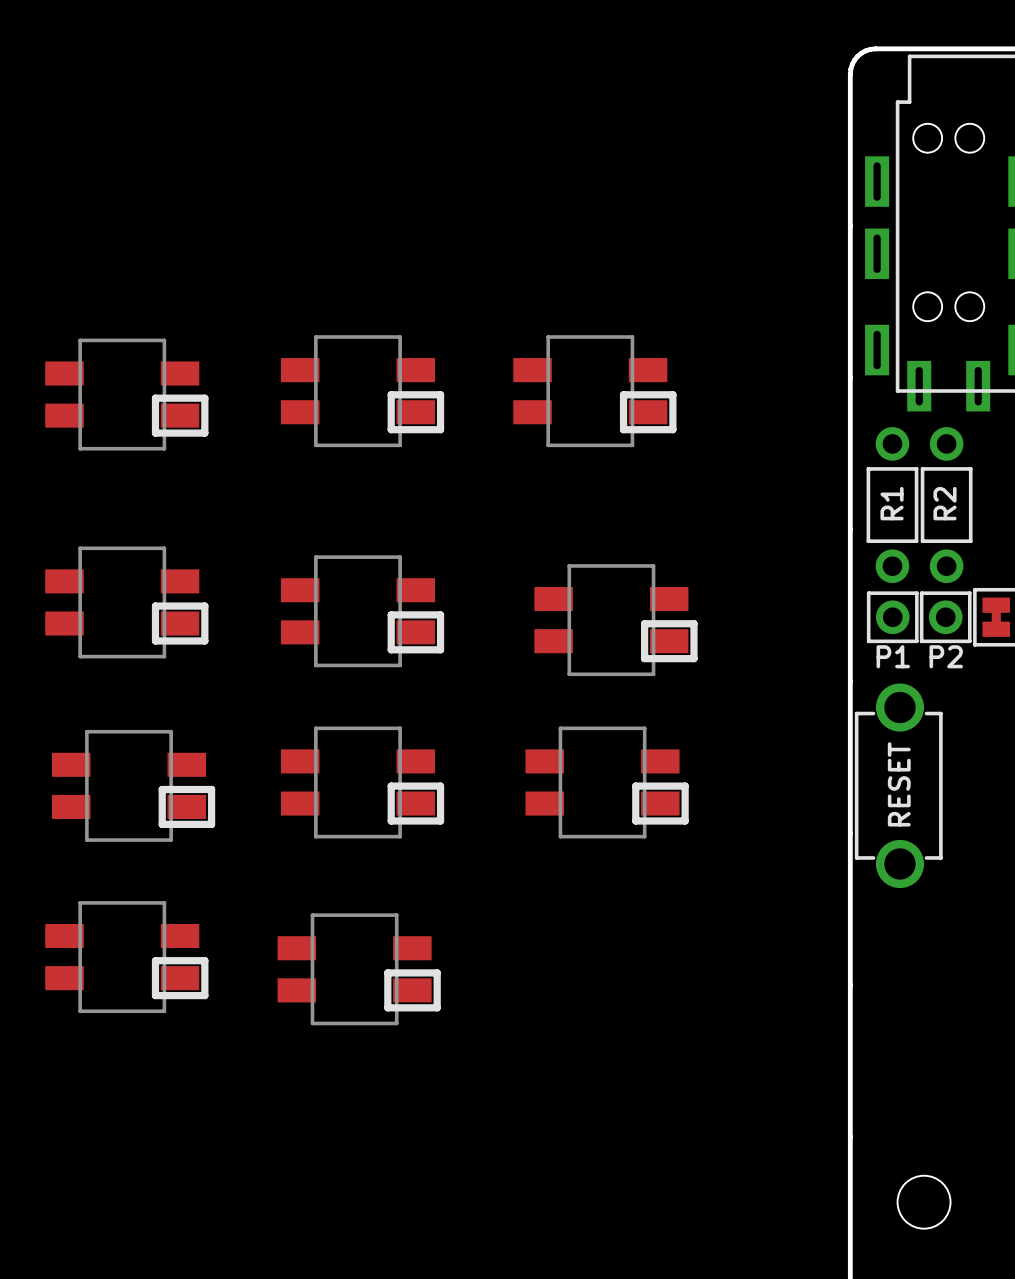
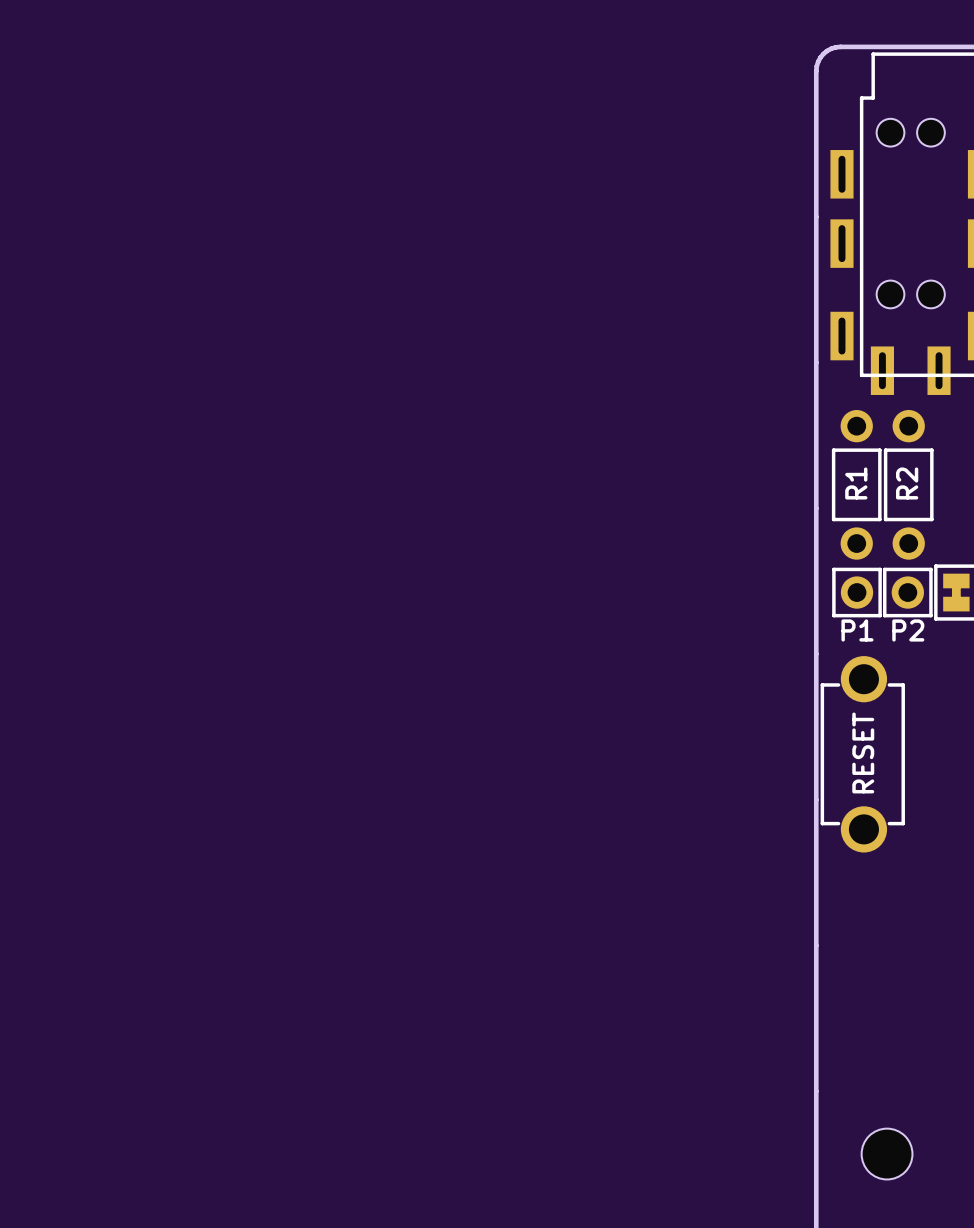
part: (362, 391) -> none
part: (594, 391) -> none
part: (126, 394) -> none
part: (126, 602) -> none
part: (362, 611) -> none
part: (615, 620) -> none
part: (362, 782) -> none
part: (607, 782) -> none
part: (133, 785) -> none
part: (126, 957) -> none
part: (359, 969) -> none

